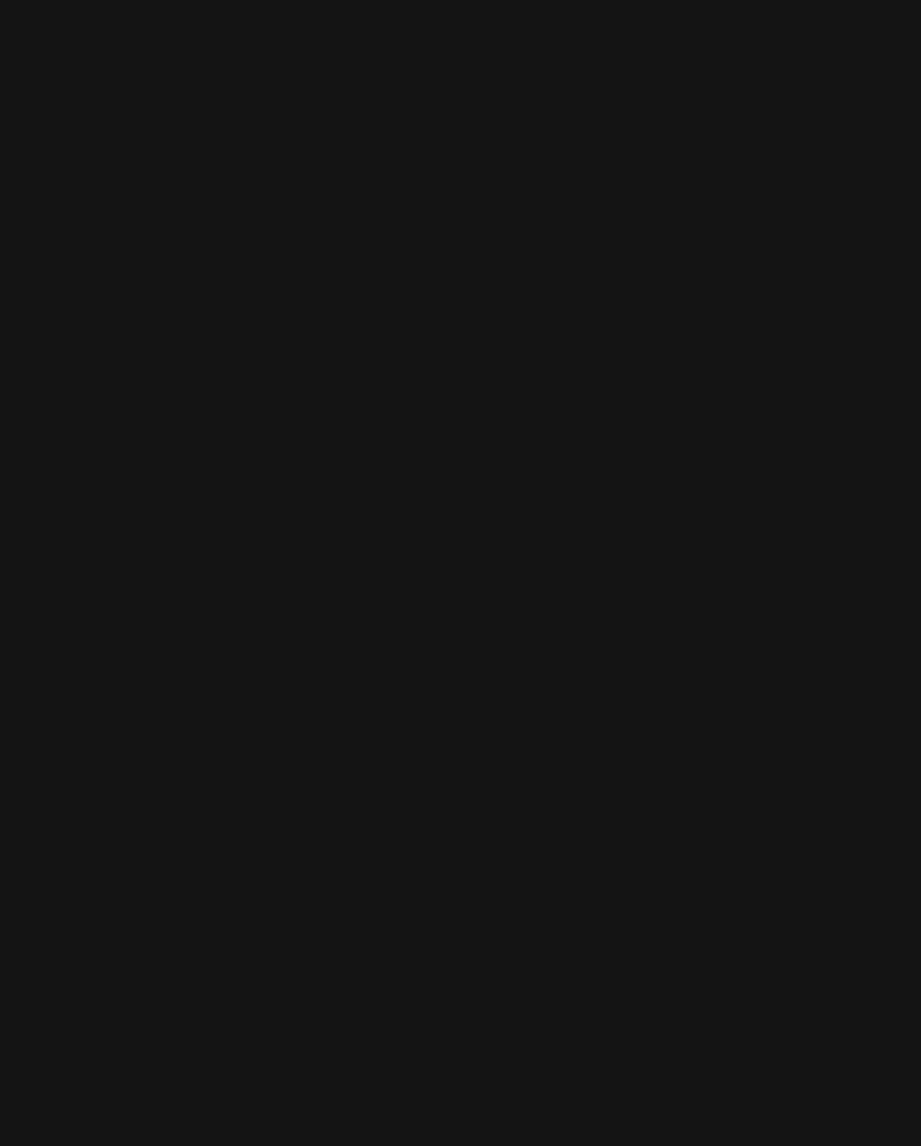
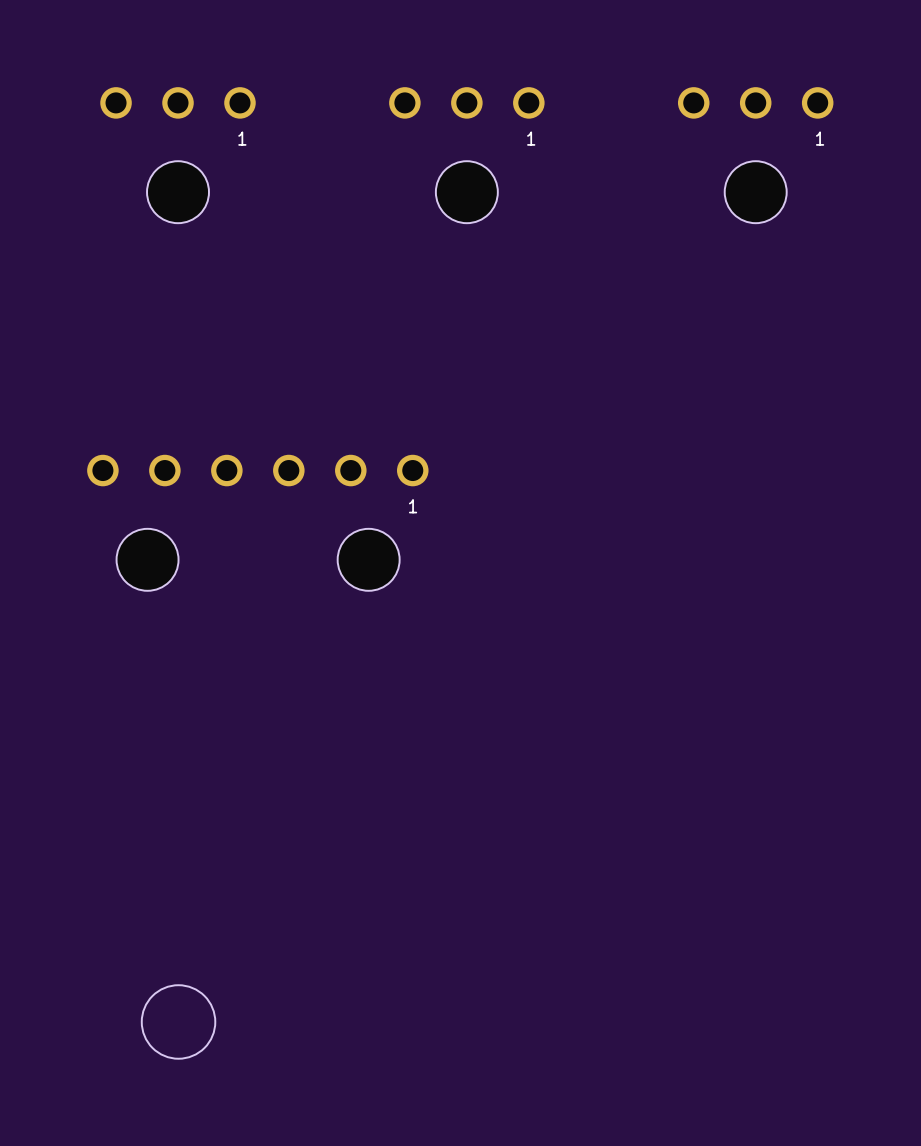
part: none -> (178, 155)
part: none -> (466, 155)
part: none -> (755, 155)
part: none -> (257, 522)
drawing: none -> [141, 984, 216, 1060]

